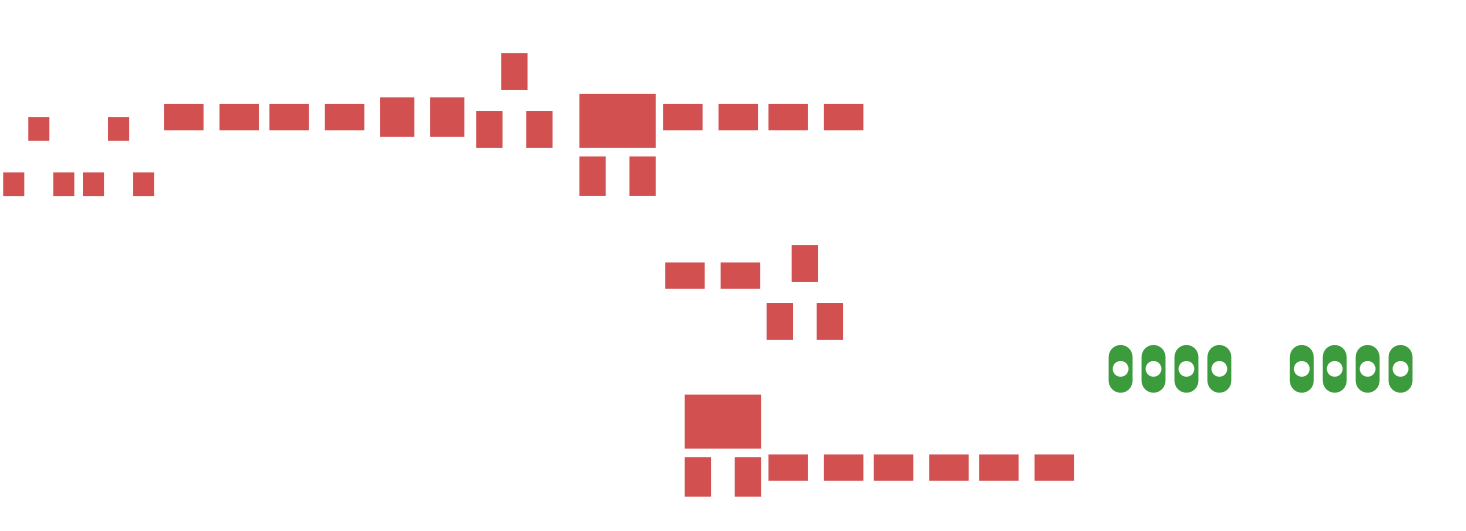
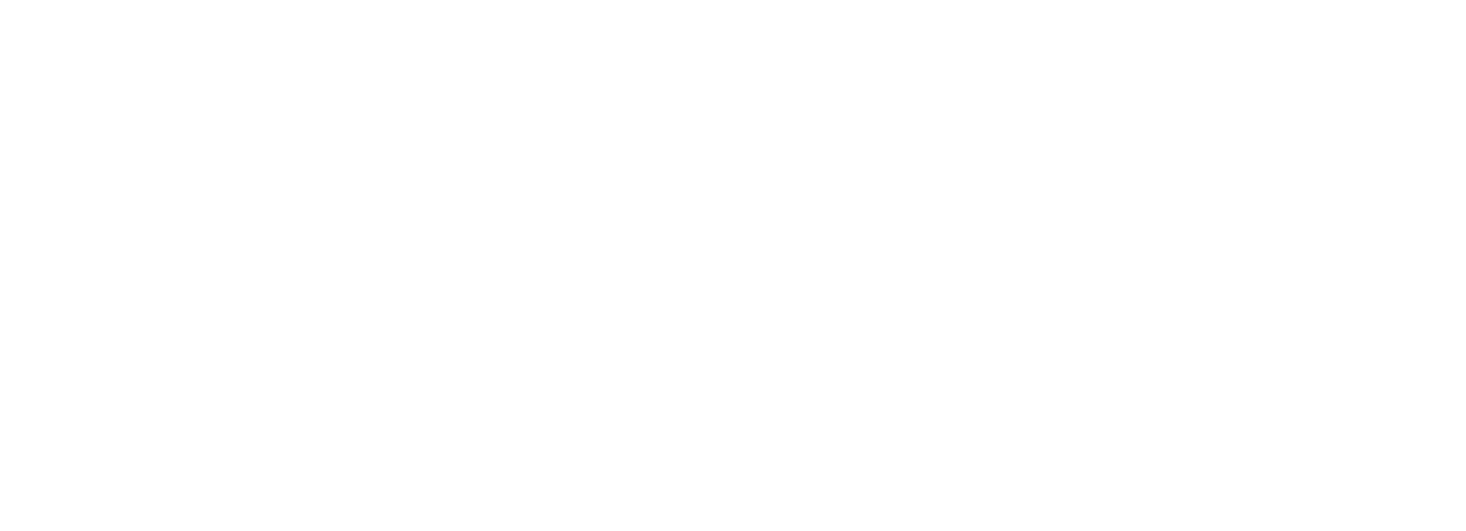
part: (514, 100) -> none
part: (211, 117) -> none
part: (316, 117) -> none
part: (422, 117) -> none
part: (710, 117) -> none
part: (815, 117) -> none
part: (617, 144) -> none
part: (38, 156) -> none
part: (118, 156) -> none
part: (712, 275) -> none
part: (804, 292) -> none
part: (1169, 368) -> none
part: (1351, 368) -> none
part: (722, 445) -> none
part: (815, 467) -> none
part: (921, 467) -> none
part: (1026, 467) -> none

